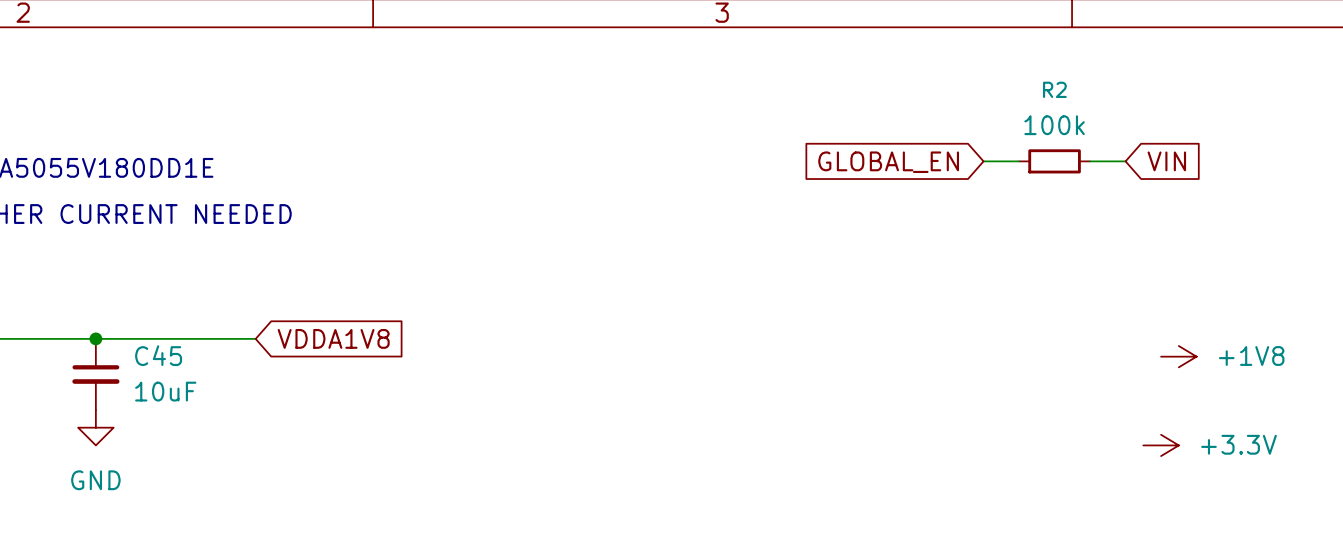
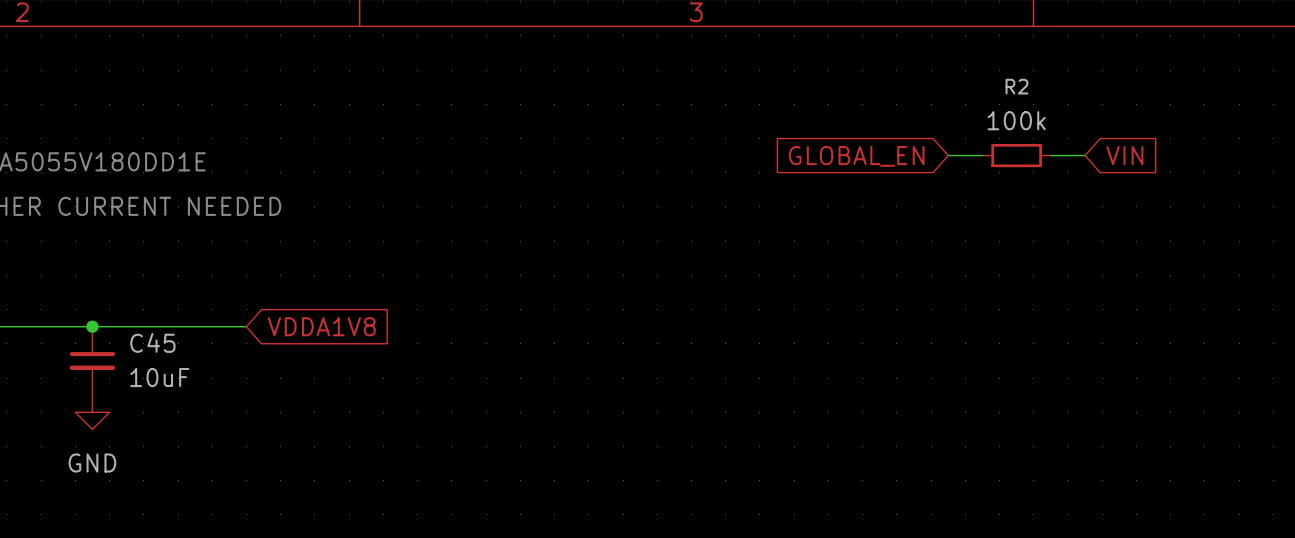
power symbol: +1V8 (1178, 356) -> none
power symbol: +3.3V (1161, 445) -> none

